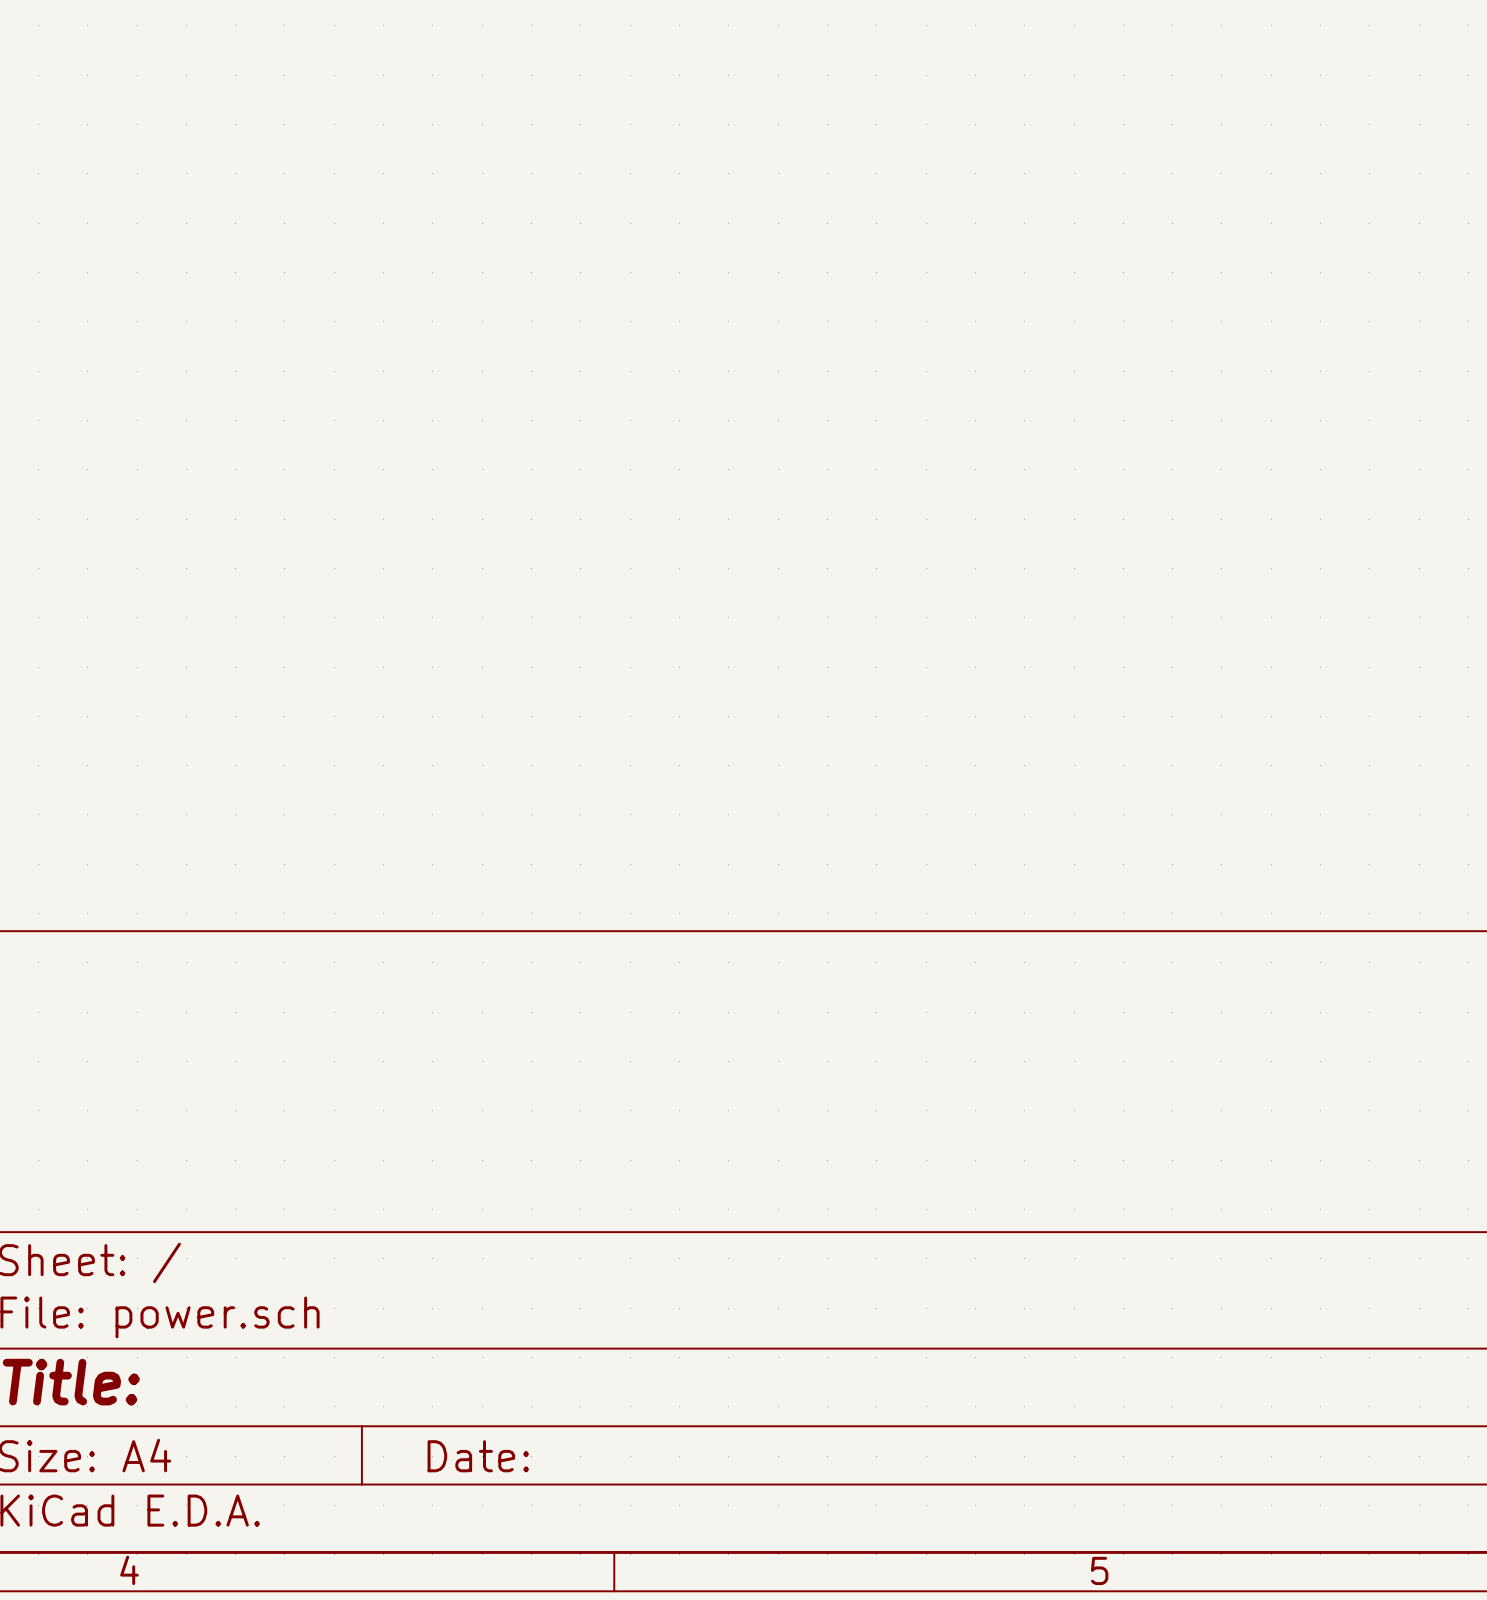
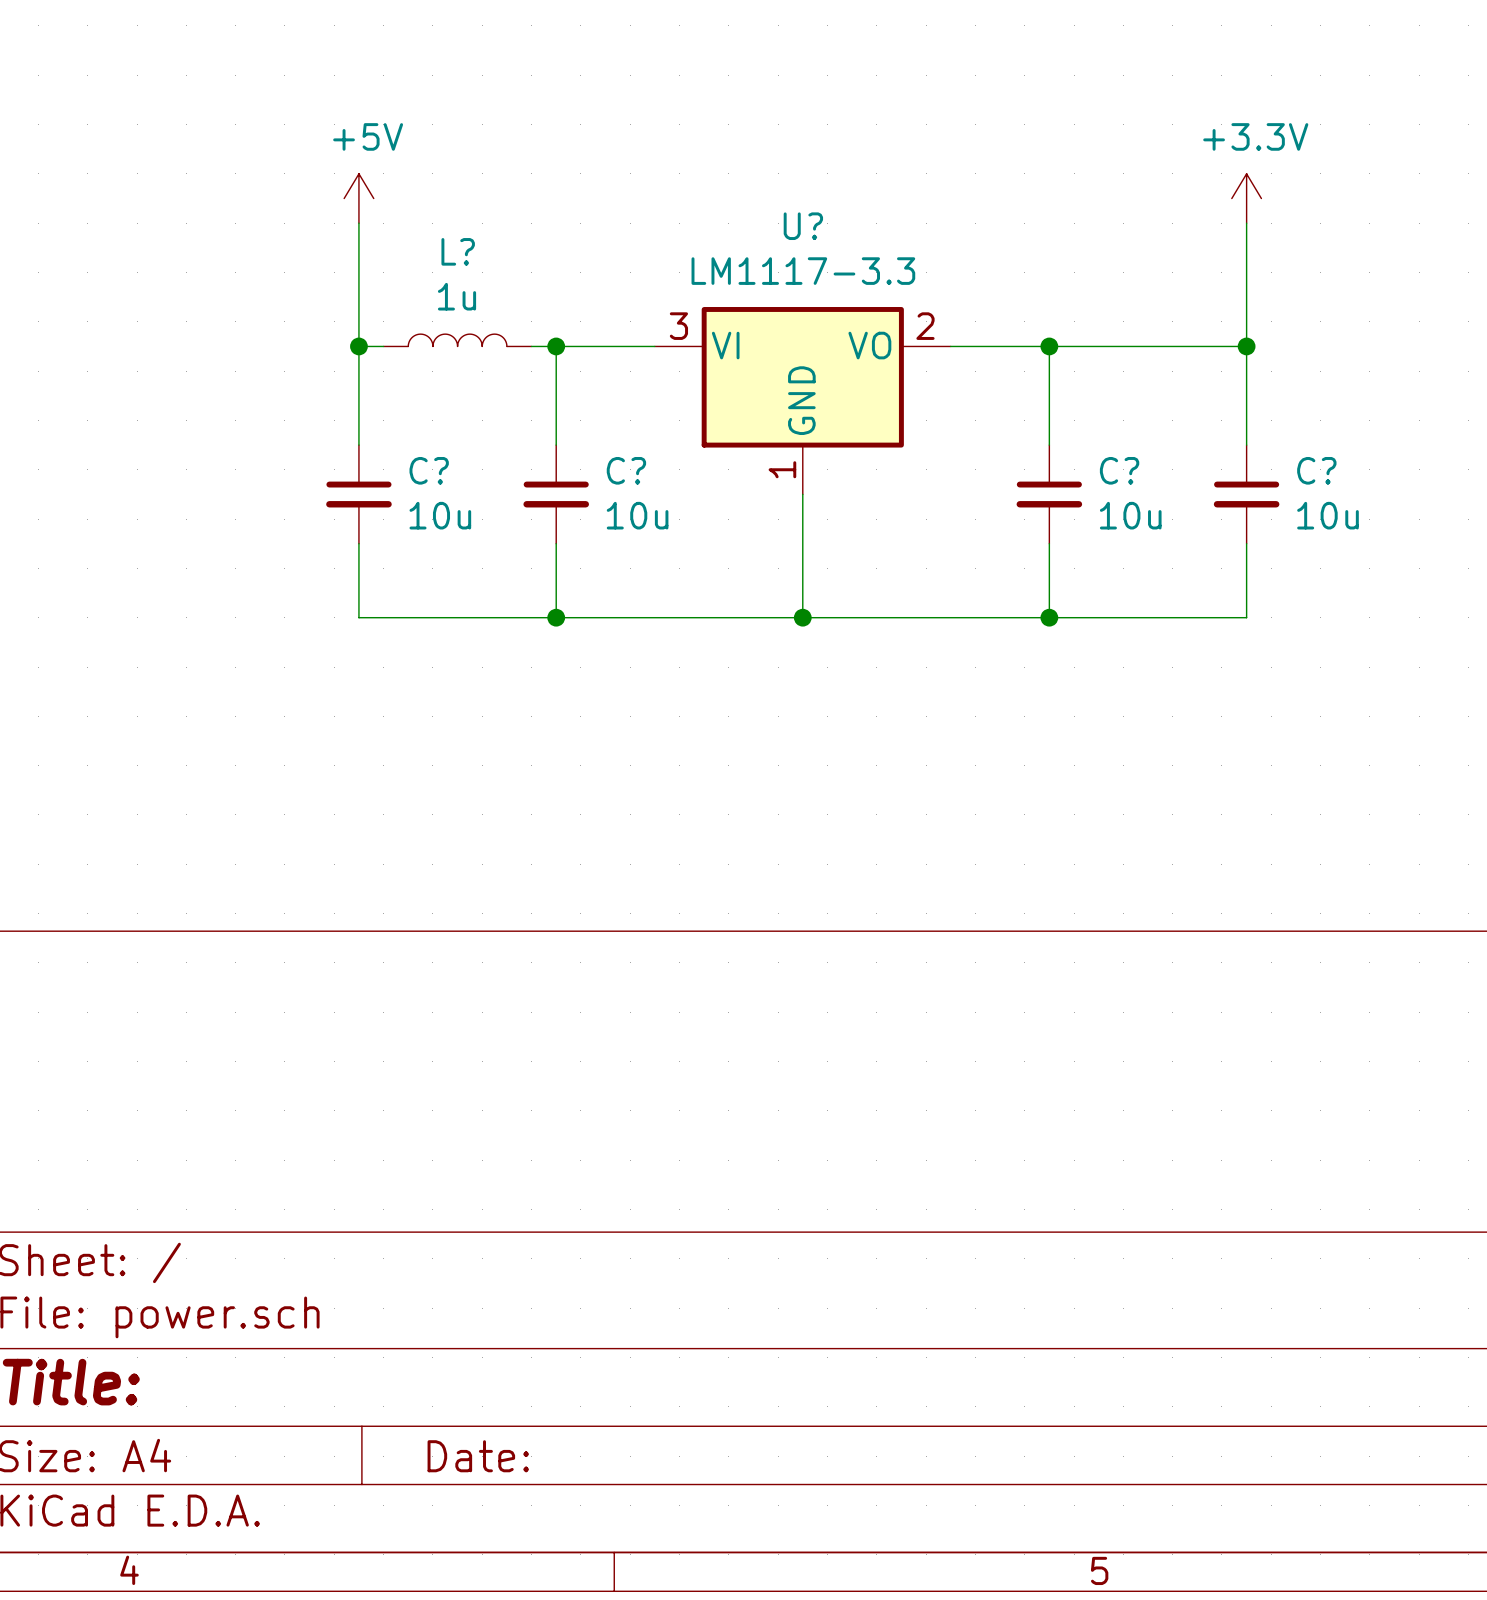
power symbol: none -> +5V (358, 198)
power symbol: none -> +3.3V (1246, 198)
wire: none -> (358, 223) (358, 445)
wire: none -> (1246, 223) (1246, 445)
L?: none -> 1u (457, 340)
wire: none -> (358, 346) (383, 346)
junction: none -> (358, 346)
wire: none -> (531, 346) (654, 346)
wire: none -> (556, 346) (556, 445)
junction: none -> (556, 346)
wire: none -> (950, 346) (1246, 346)
wire: none -> (1049, 346) (1049, 445)
junction: none -> (1049, 346)
junction: none -> (1246, 346)
U?: none -> LM1117-3.3 (802, 400)
C?: none -> 10u (358, 494)
C?: none -> 10u (556, 494)
wire: none -> (802, 494) (802, 617)
C?: none -> 10u (1049, 494)
C?: none -> 10u (1246, 494)
wire: none -> (358, 543) (358, 617) (1246, 617) (1246, 543)
wire: none -> (556, 543) (556, 617)
wire: none -> (1049, 543) (1049, 617)
junction: none -> (556, 617)
junction: none -> (802, 617)
junction: none -> (1049, 617)

